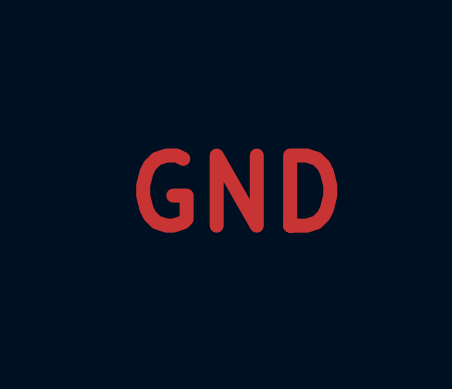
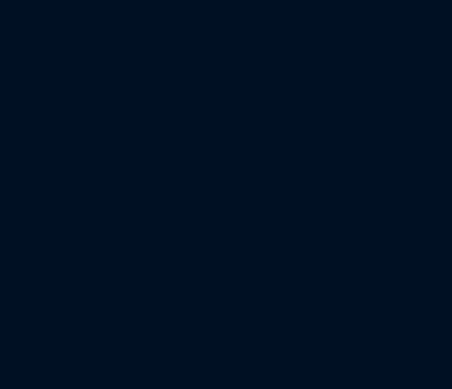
text: GND (236, 190) -> none

